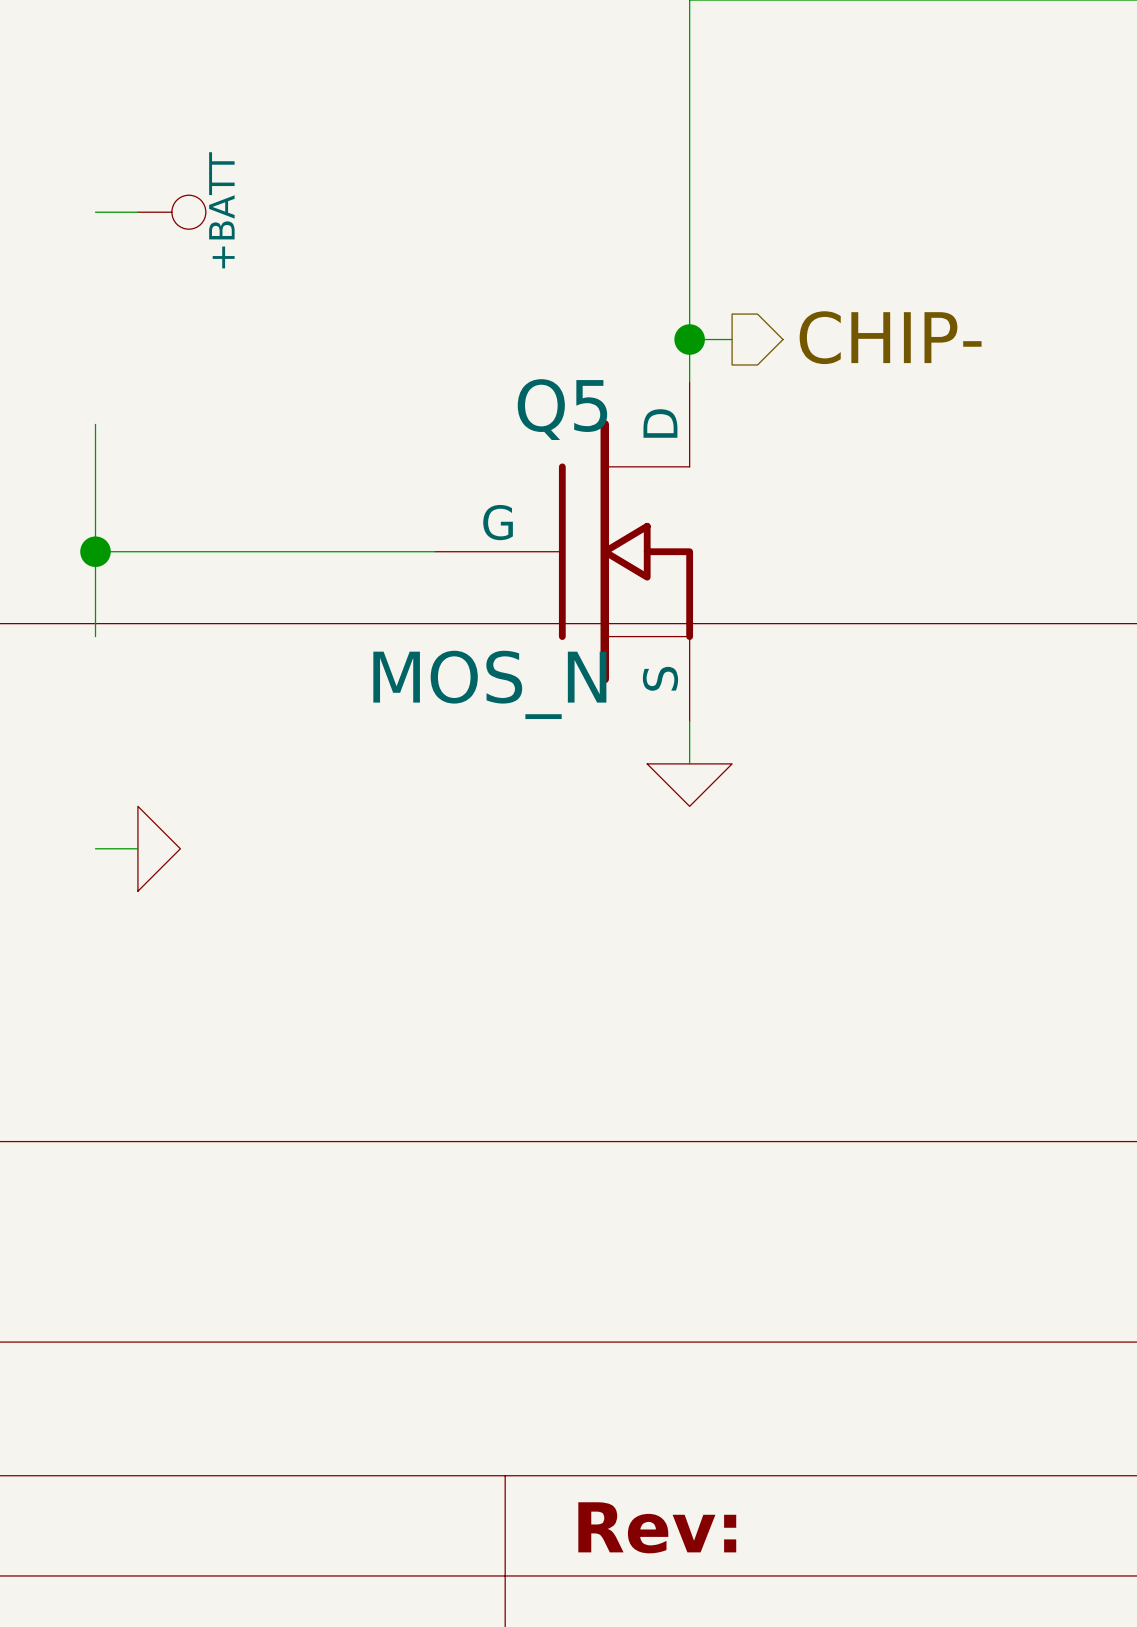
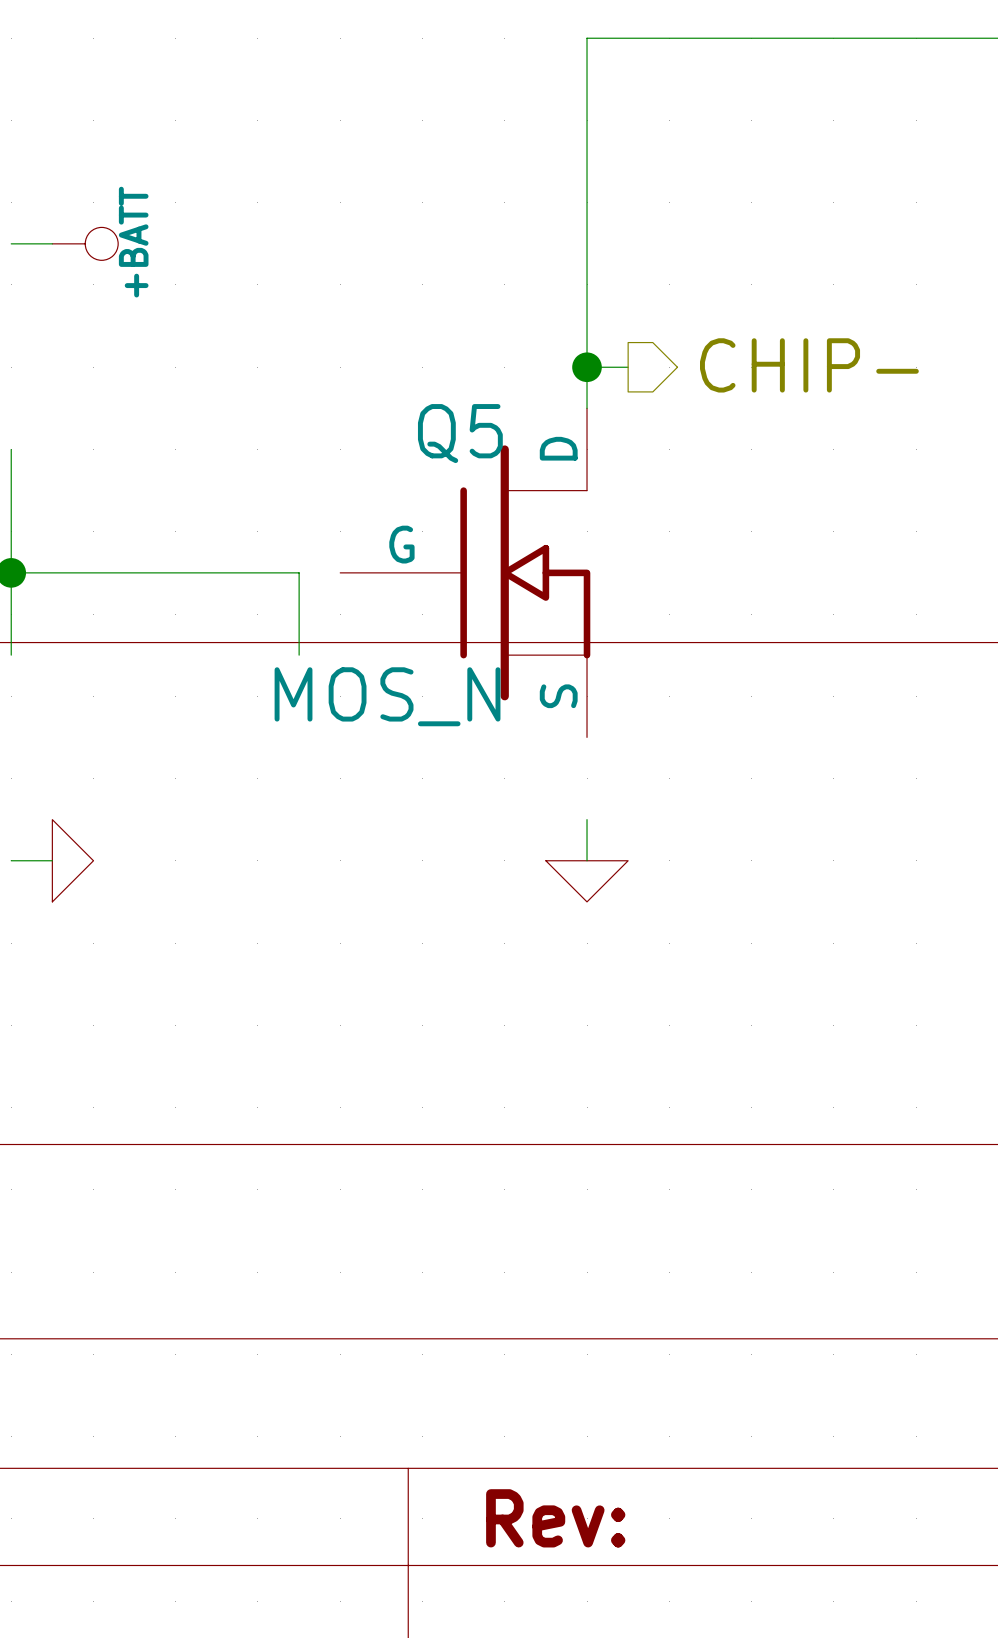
wire: (392, 551) (435, 551) -> (299, 572) (299, 655)
wire: (689, 721) (689, 763) -> (587, 819) (587, 860)
power symbol position: (689, 785) -> (587, 881)

